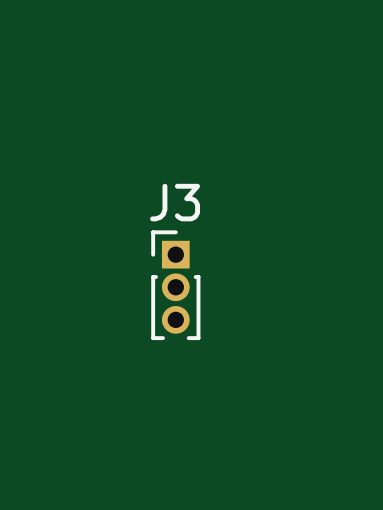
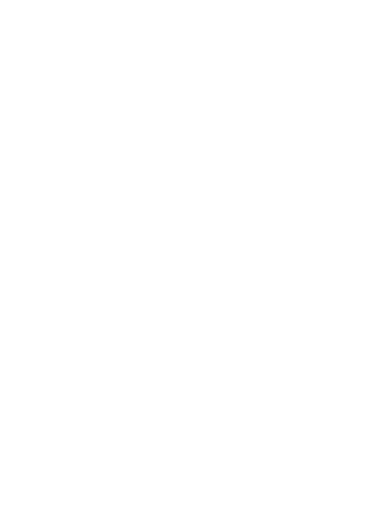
J3: (175, 285) -> none

